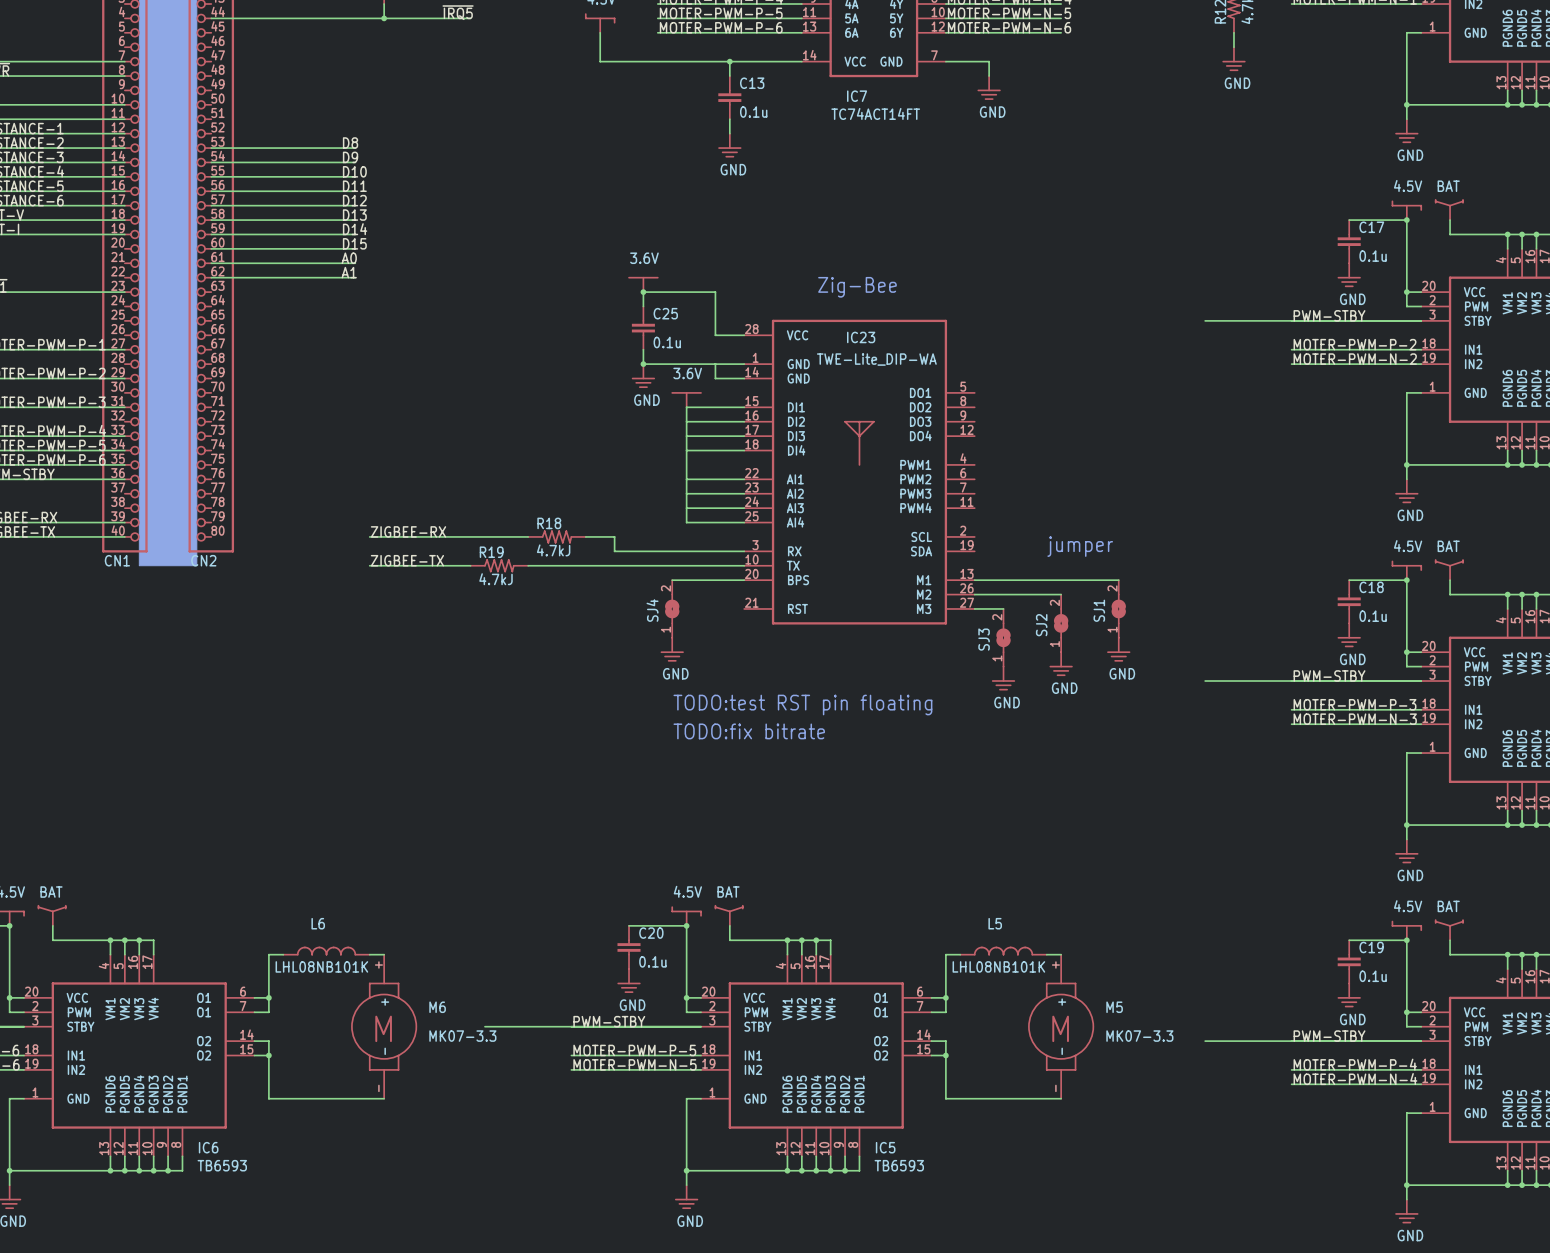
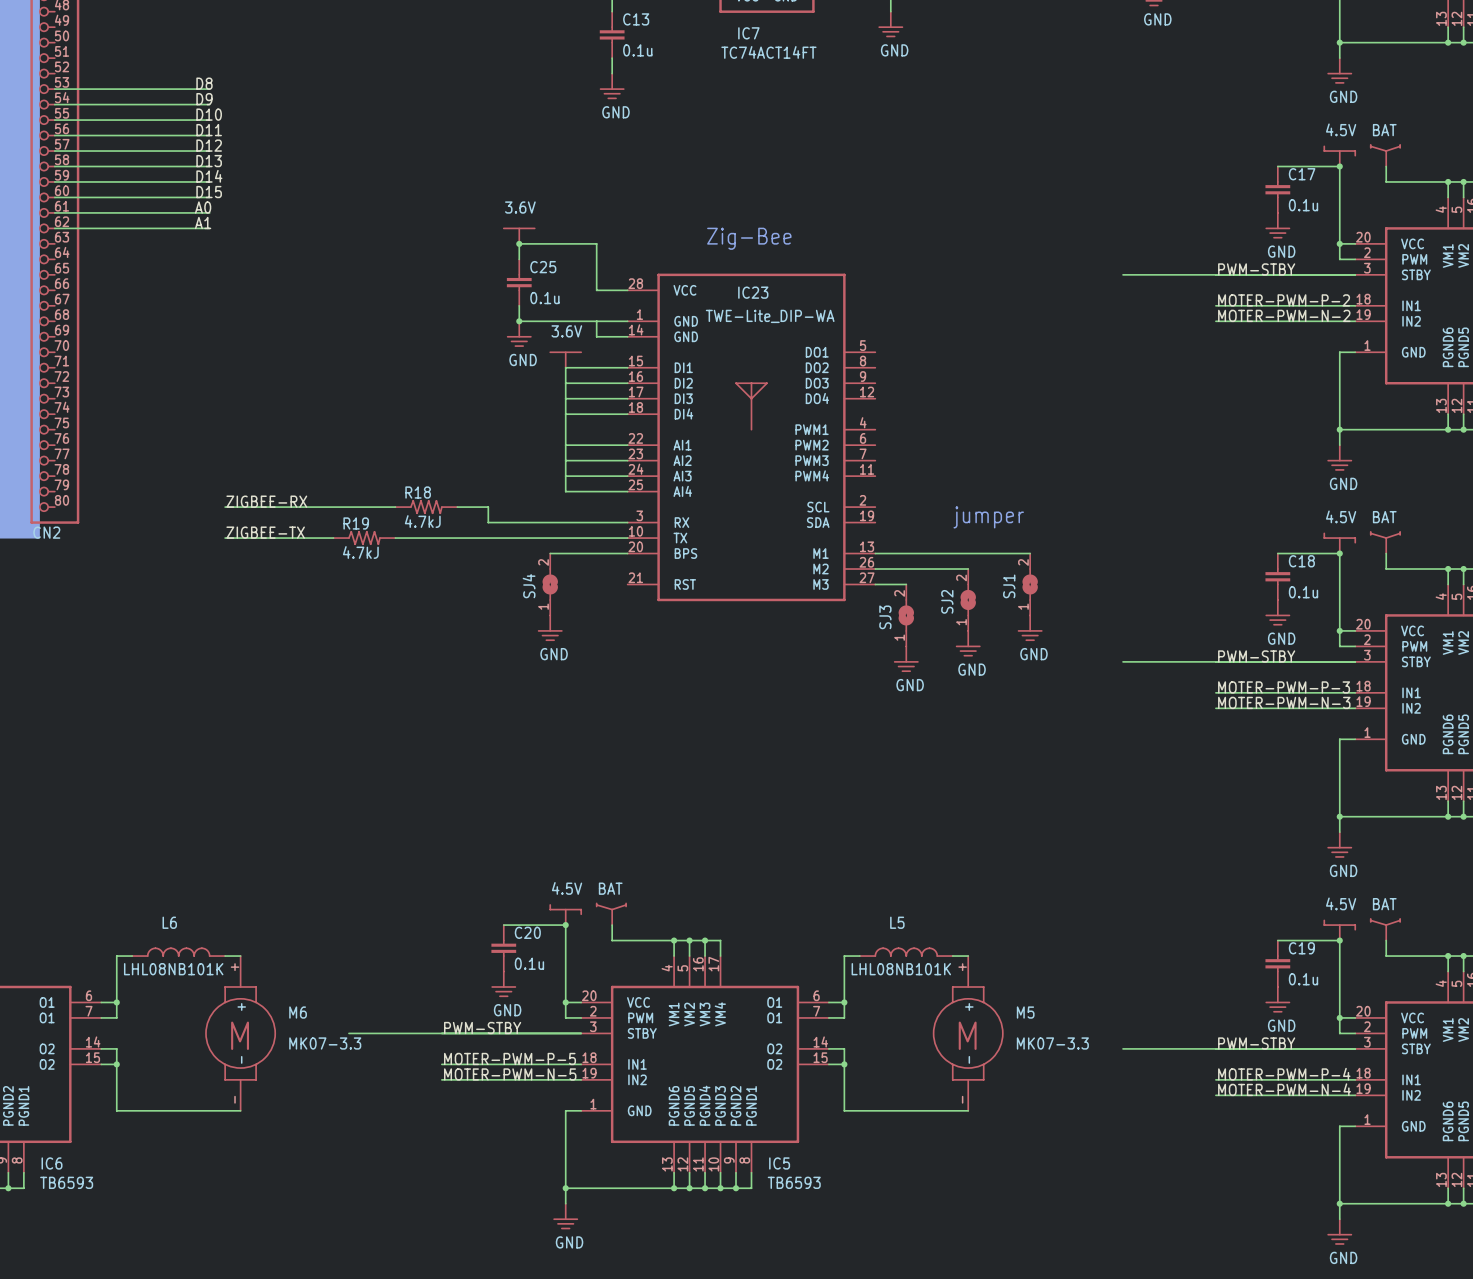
text: TODO:test RST pin floating (802, 705) -> none
text: TODO:fix bitrate (749, 731) -> none

